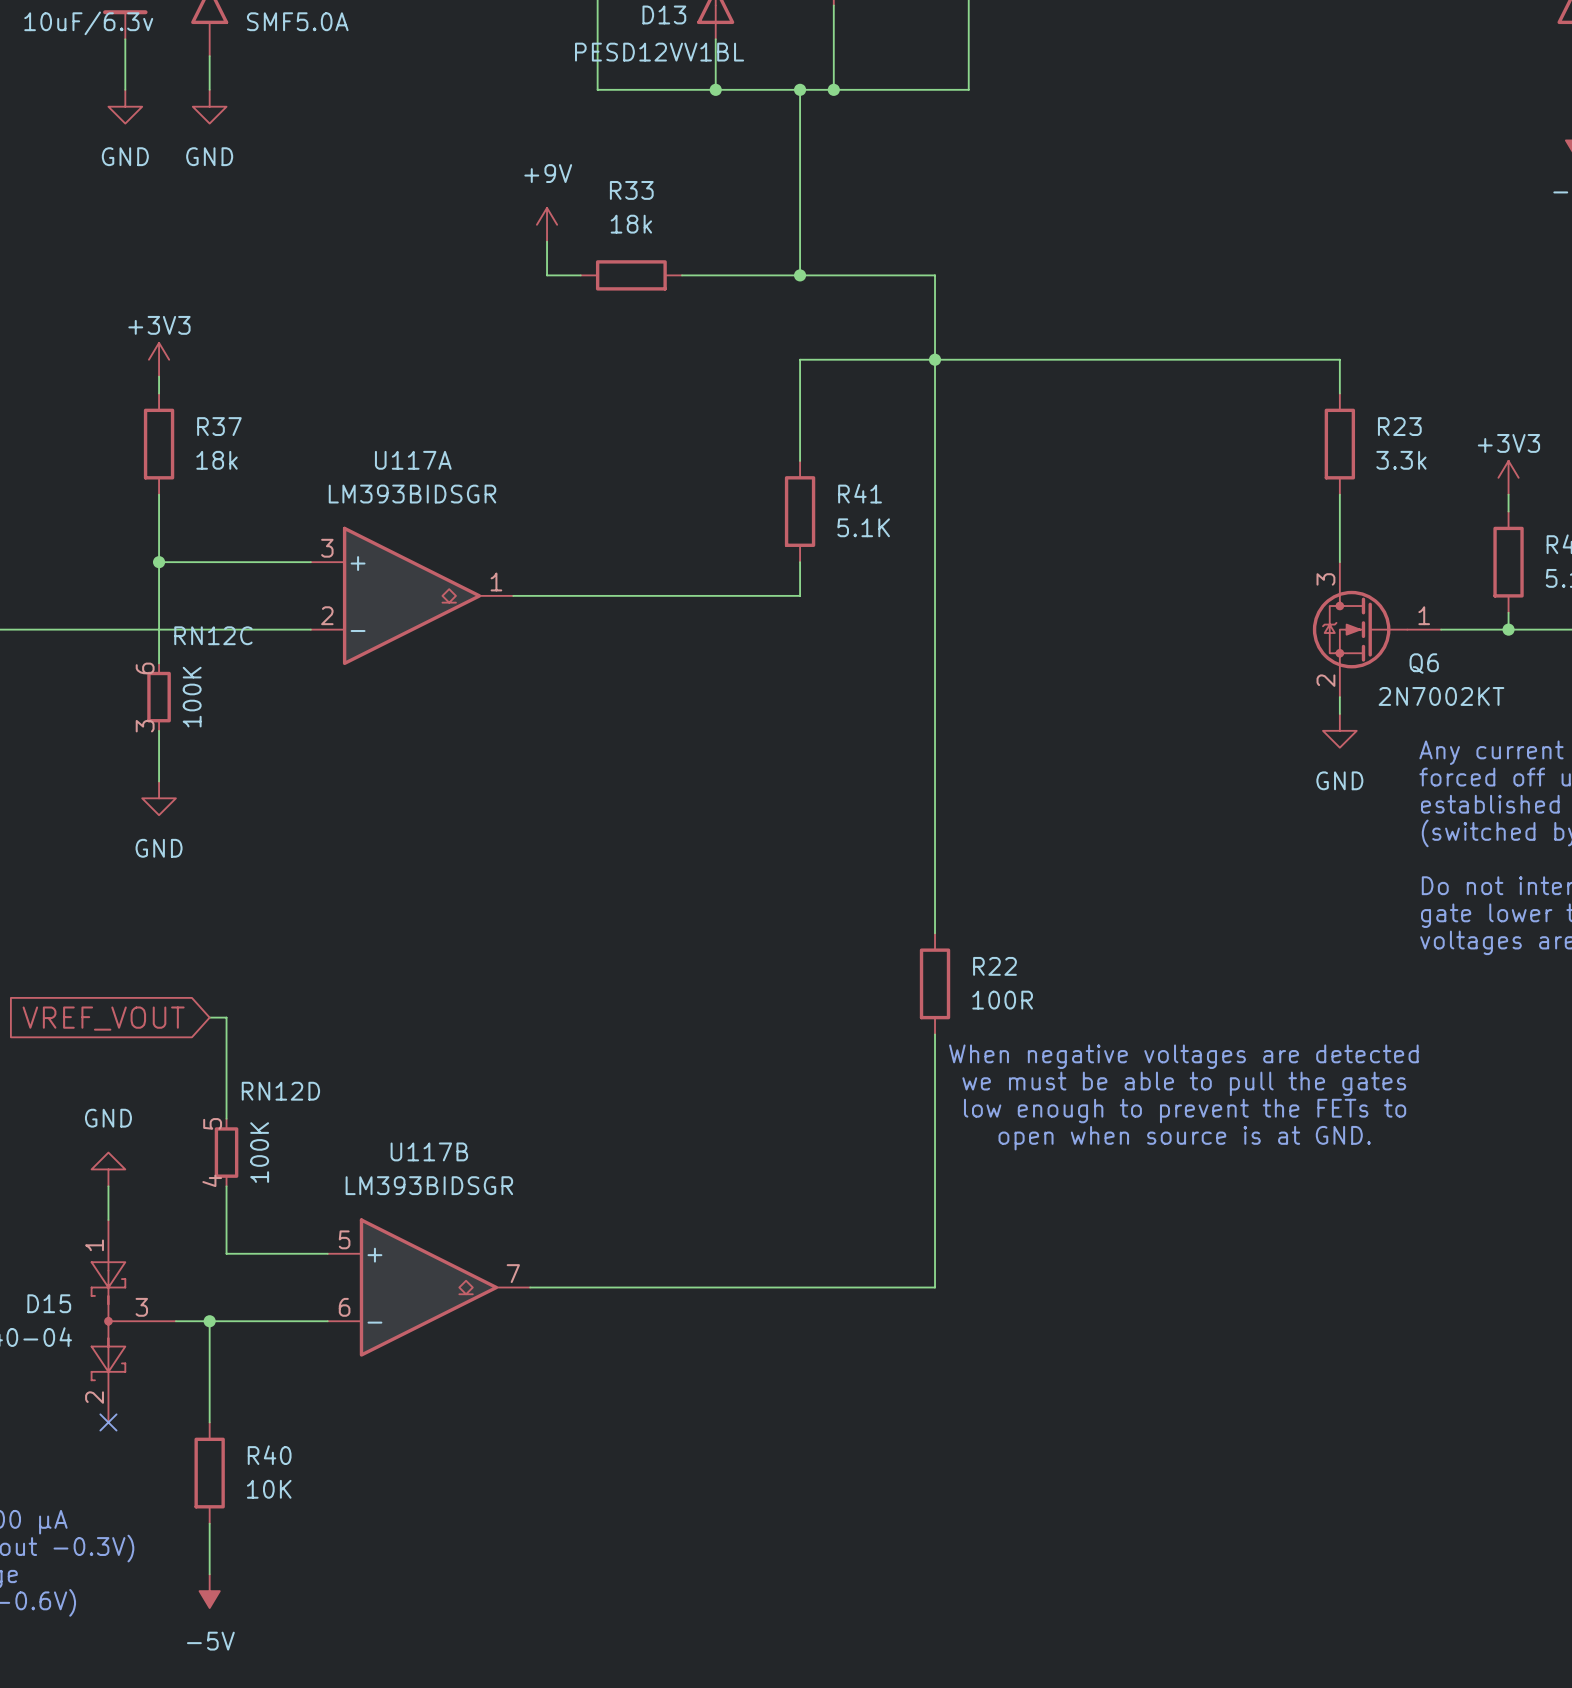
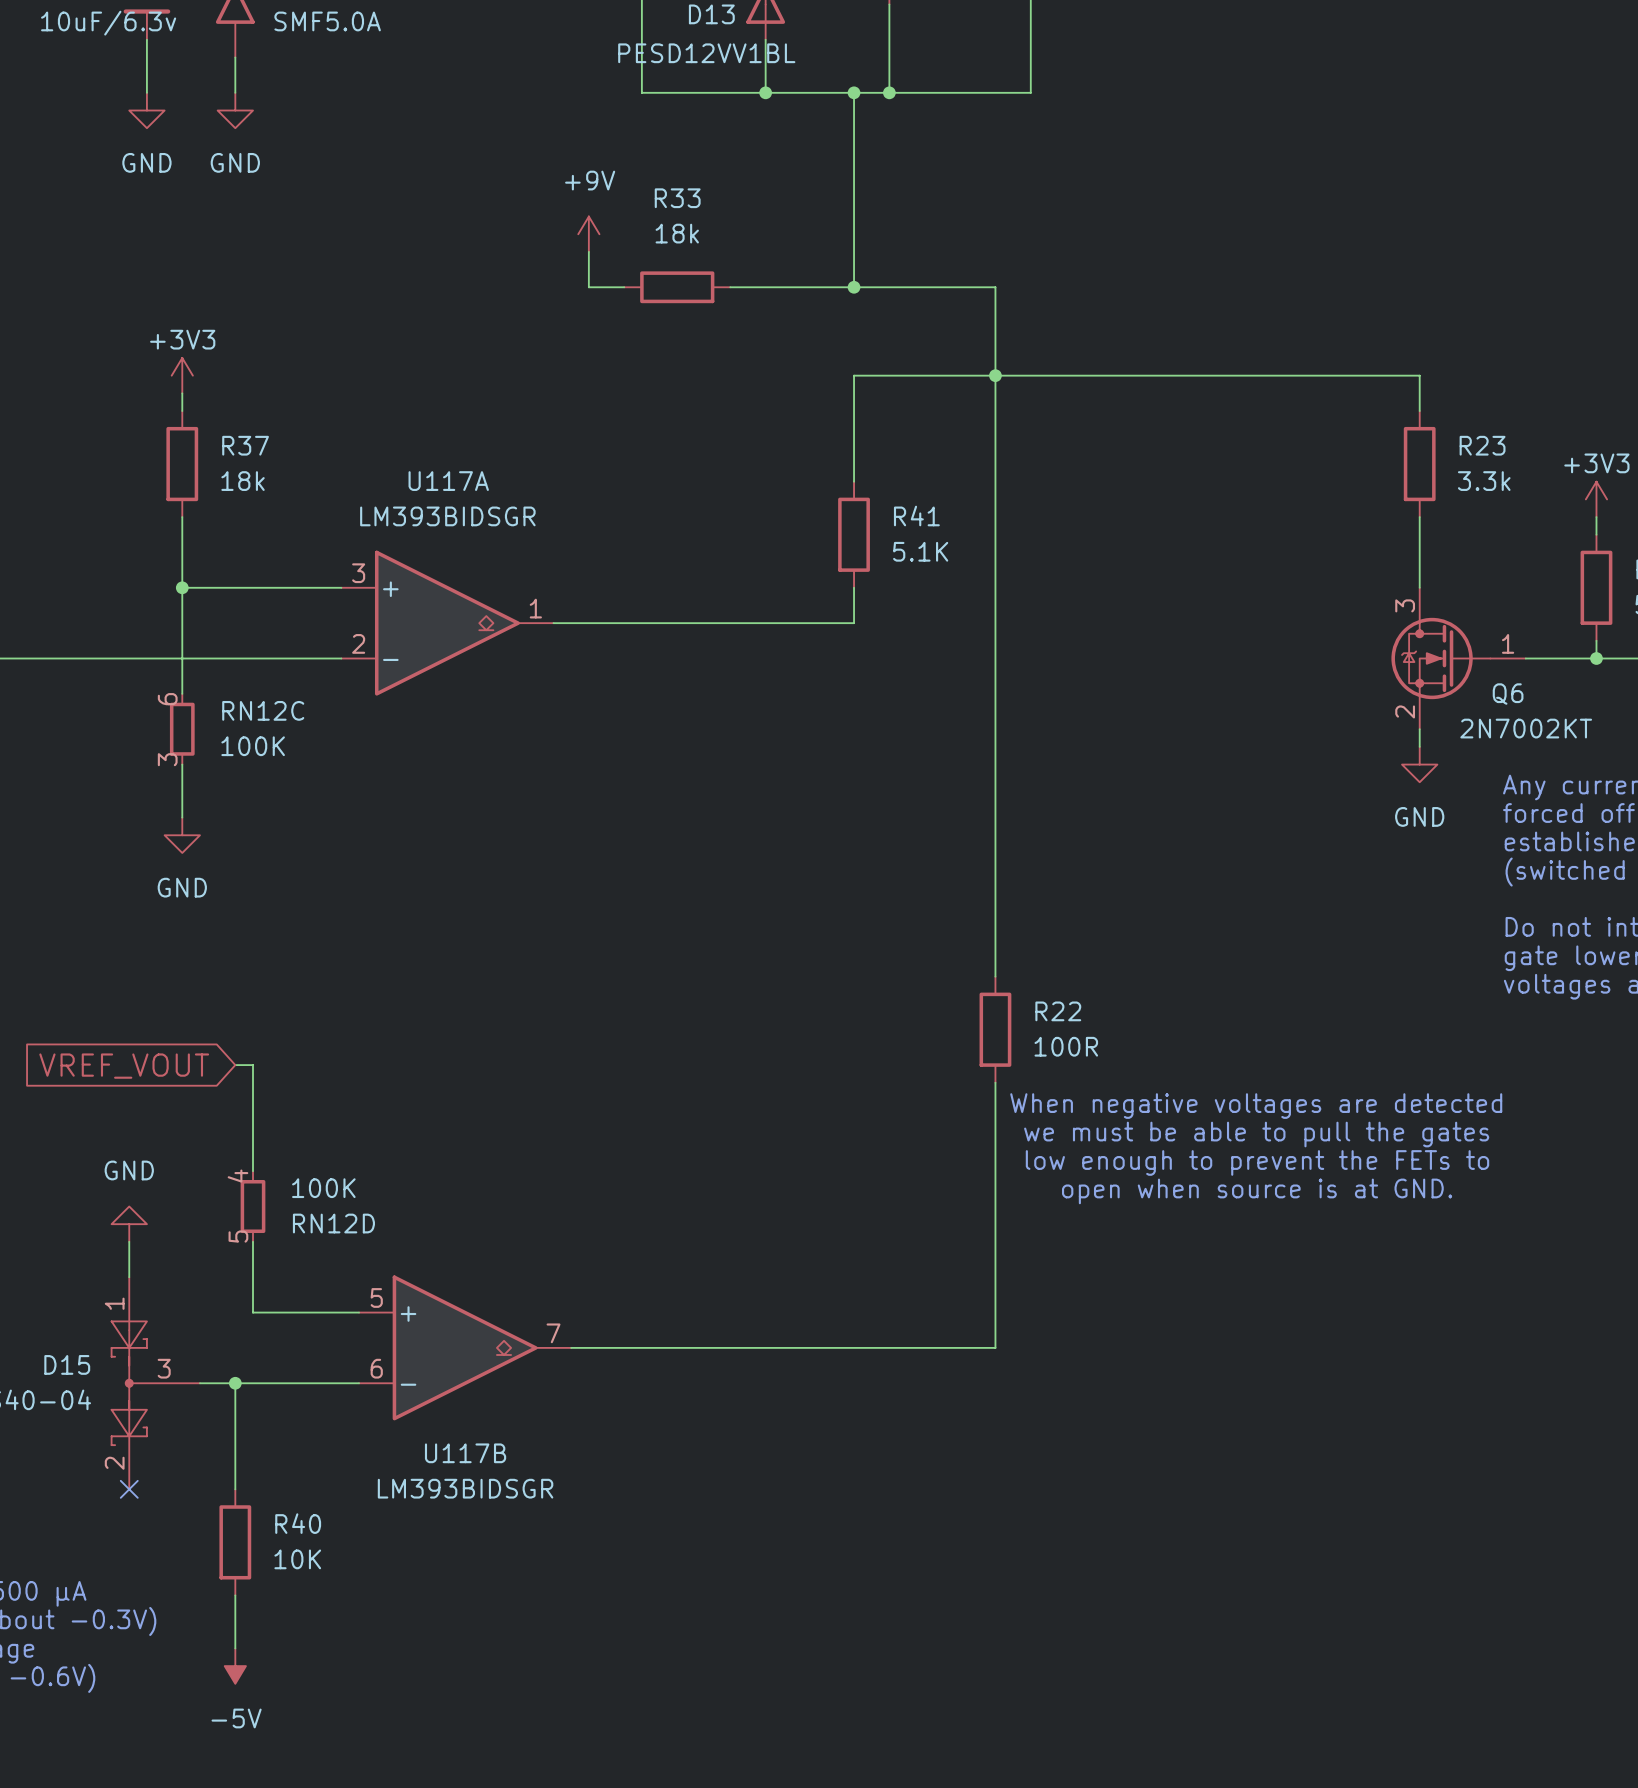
RN12C name position: RN12C (213, 635) -> RN12C (263, 710)
RN12C value rotation: 0° (192, 697) -> 90° clockwise (253, 746)
RN12D name position: RN12D (280, 1091) -> RN12D (333, 1223)
U117B name position: U117B (429, 1151) -> U117B (465, 1453)
RN12D rotation: 0° (226, 1152) -> 180° (253, 1206)
RN12D value position: 100K (259, 1152) -> 100K (323, 1188)
U117B value position: LM393BIDSGR (429, 1185) -> LM393BIDSGR (465, 1488)

